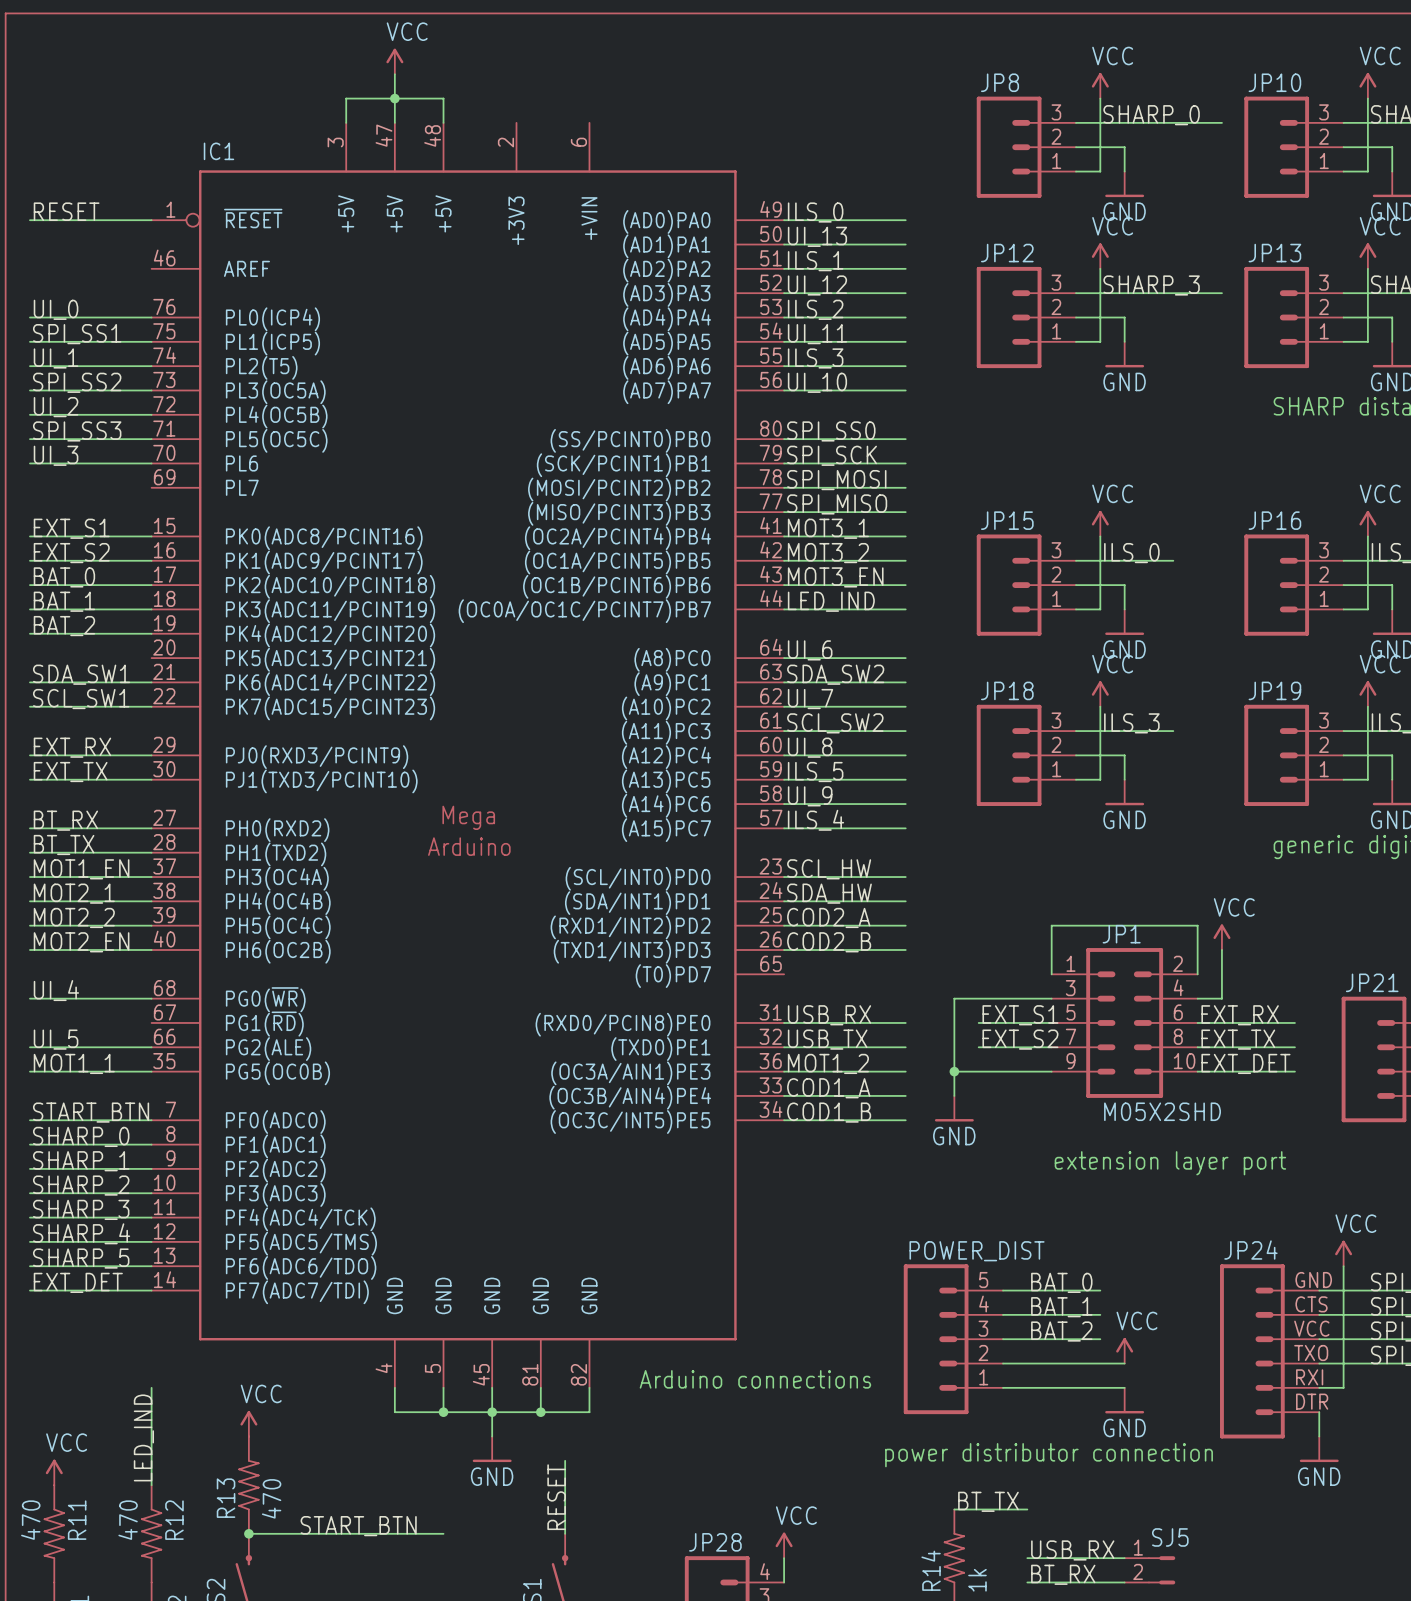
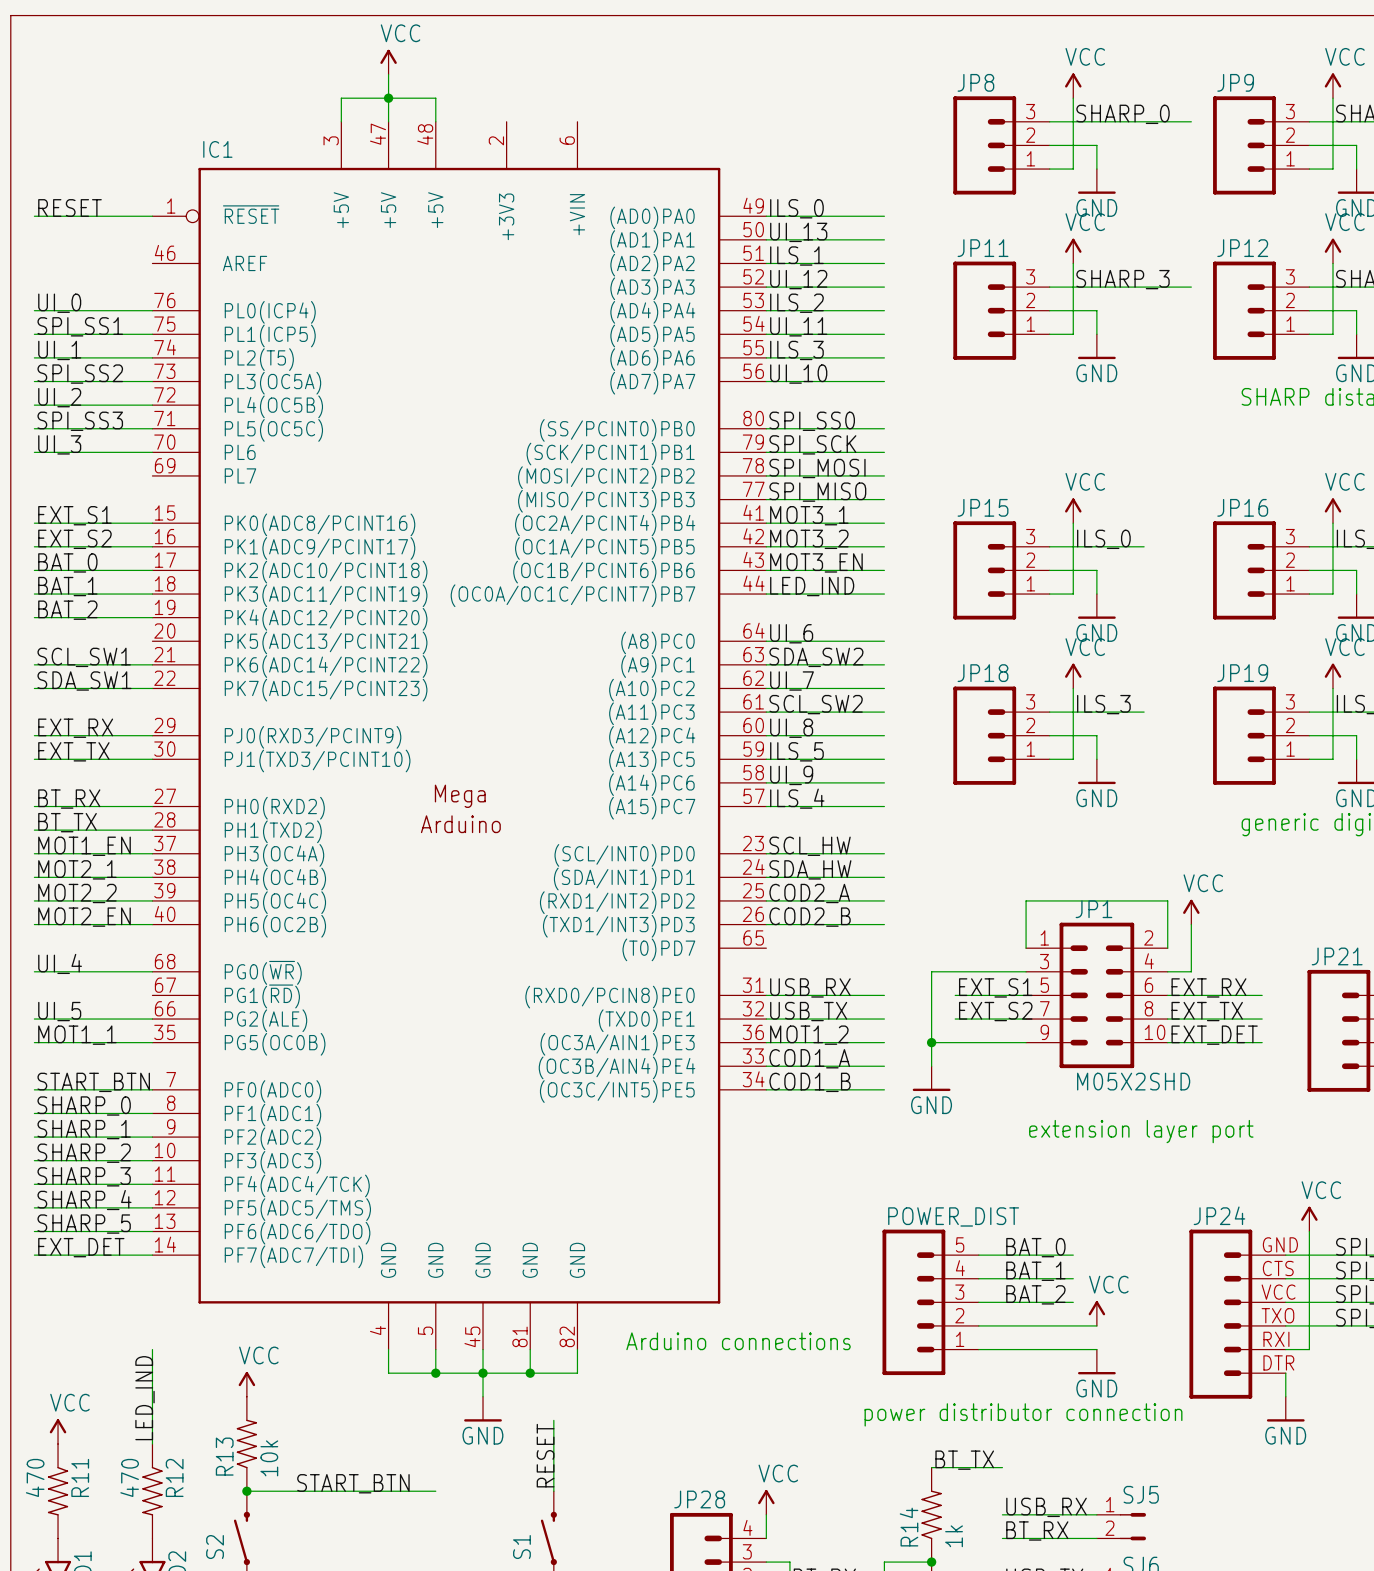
JP10 name: JP10 (1274, 82) -> JP9 (1235, 82)
JP12 name: JP12 (1007, 253) -> JP11 (983, 248)
JP13 name: JP13 (1274, 253) -> JP12 (1242, 248)
label: SDA_SW1 (81, 674) -> SCL_SW1 (84, 657)
label: SCL_SW1 (81, 699) -> SDA_SW1 (84, 680)
R13 value: 470 (271, 1498) -> 10k (269, 1458)

